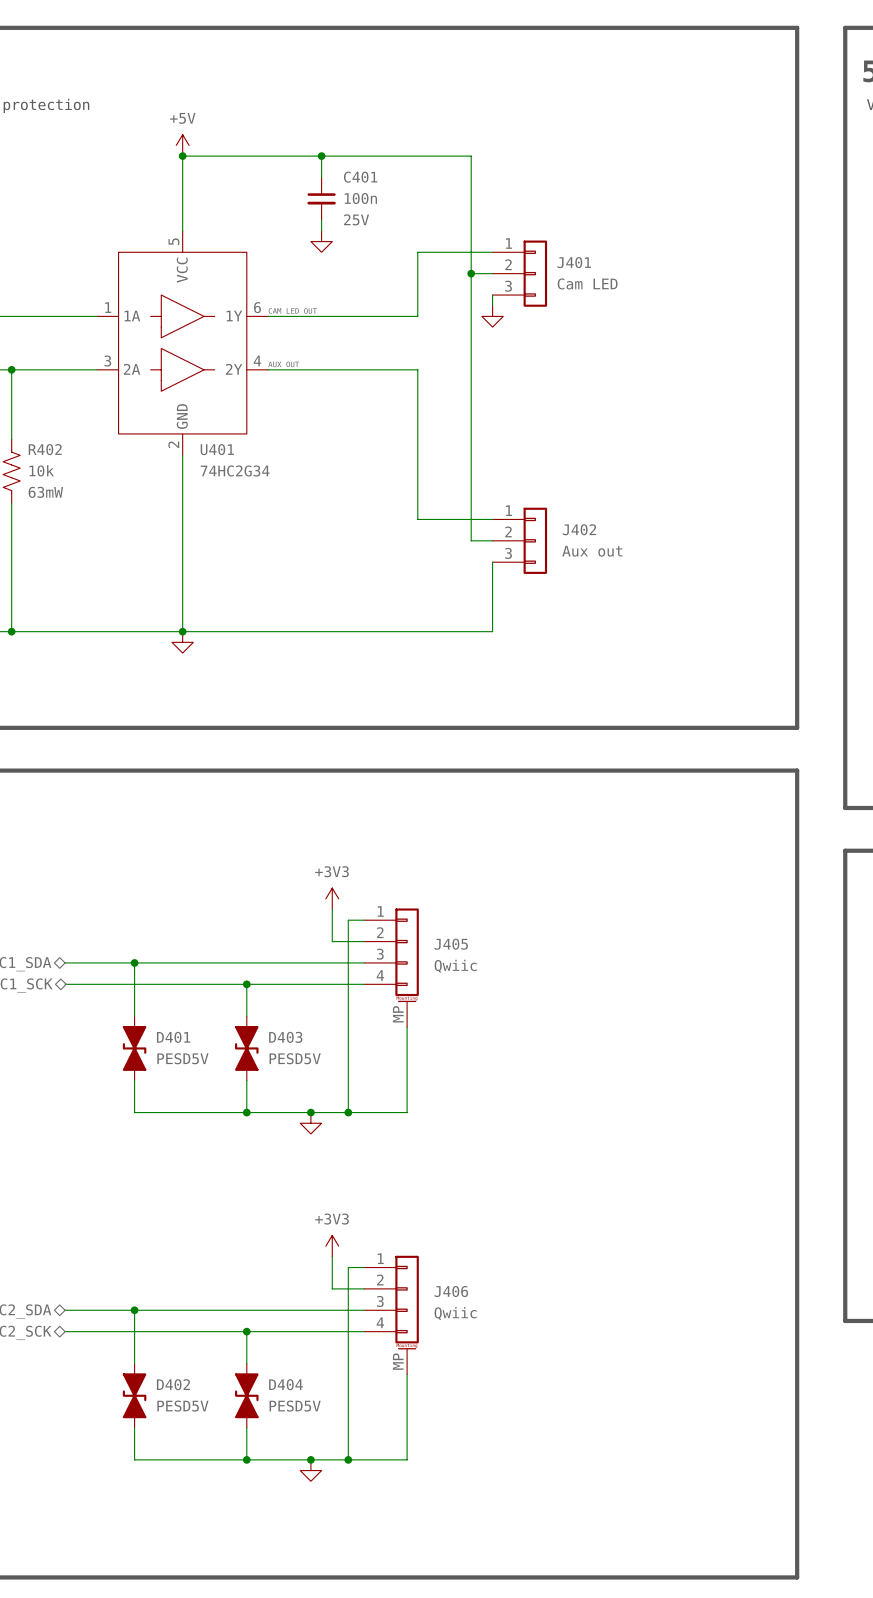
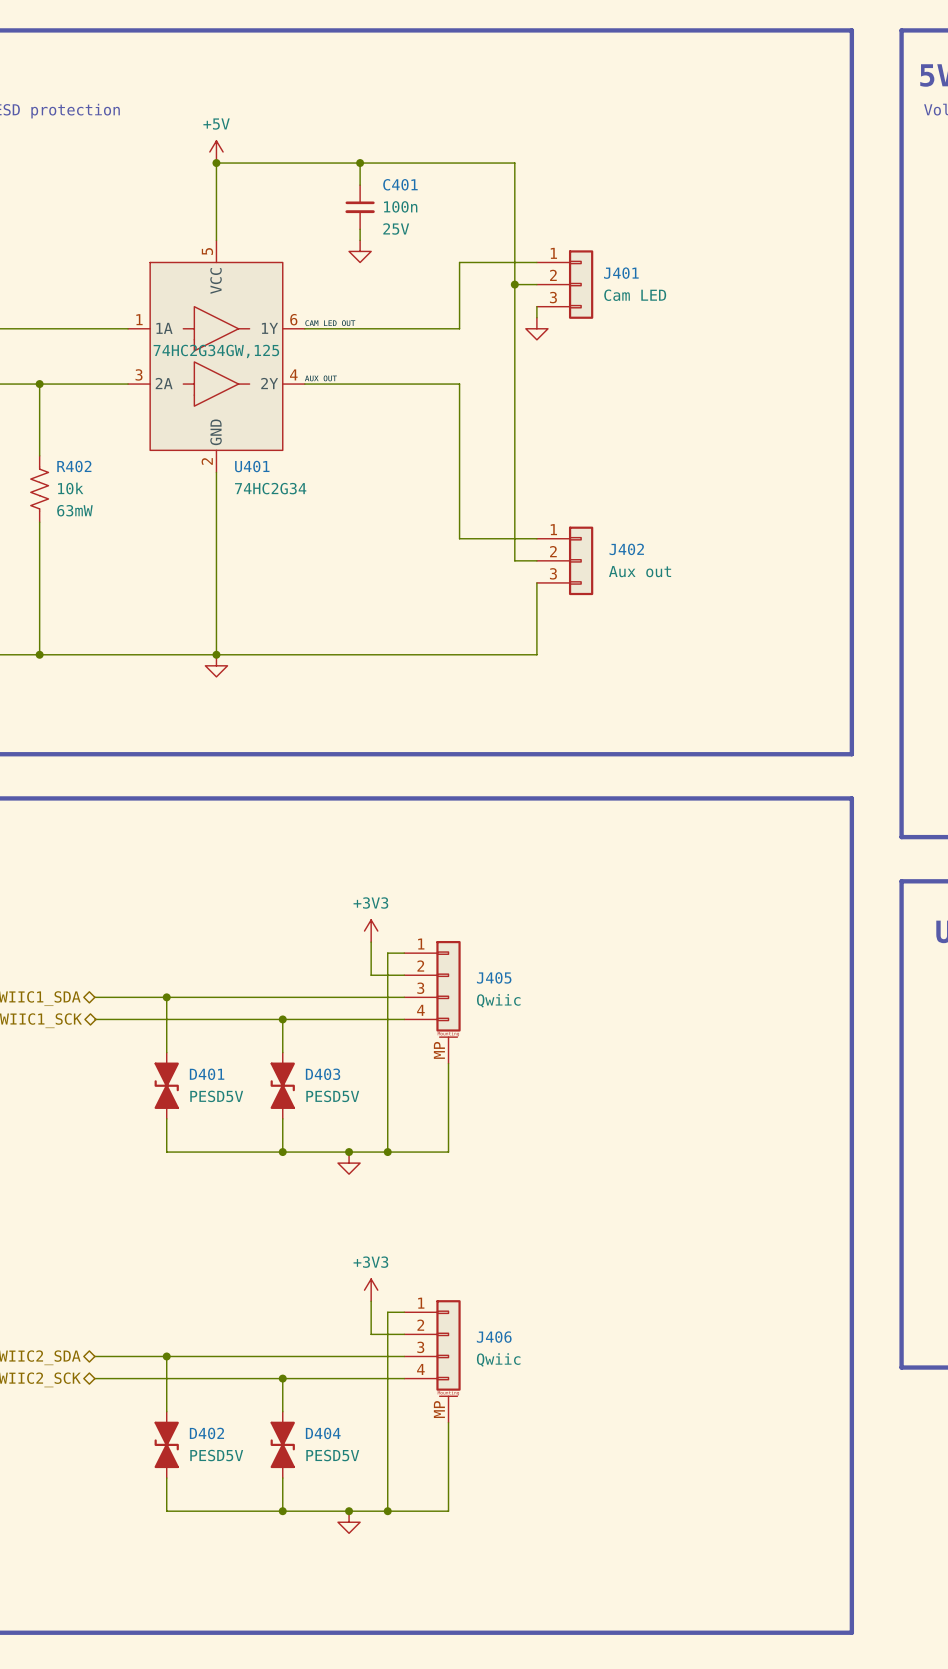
U401 text: none -> 74HC2G34GW,125 (216, 351)

